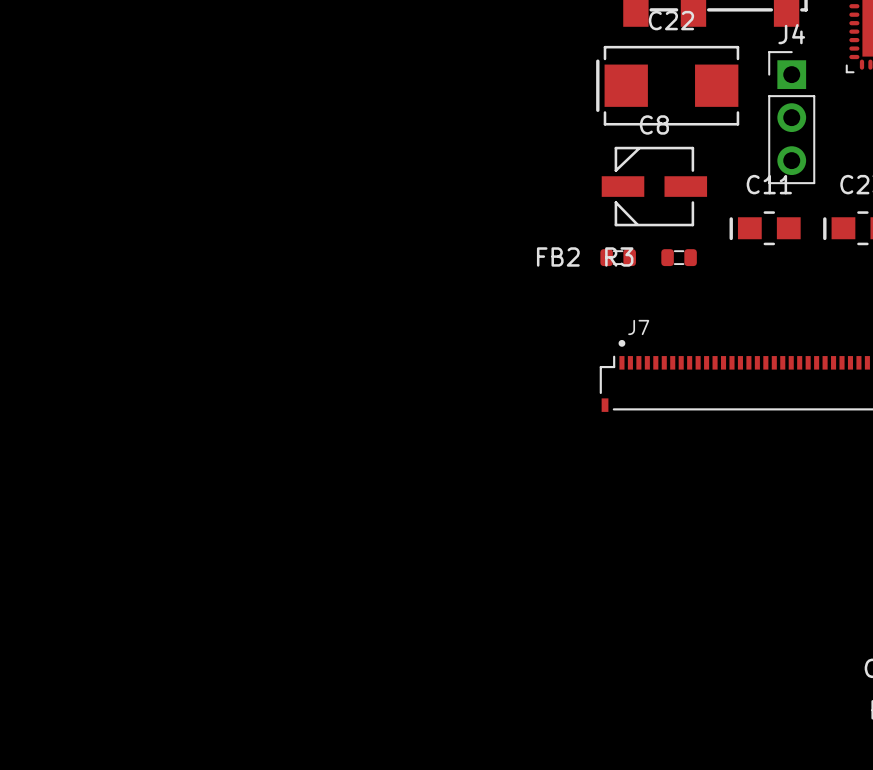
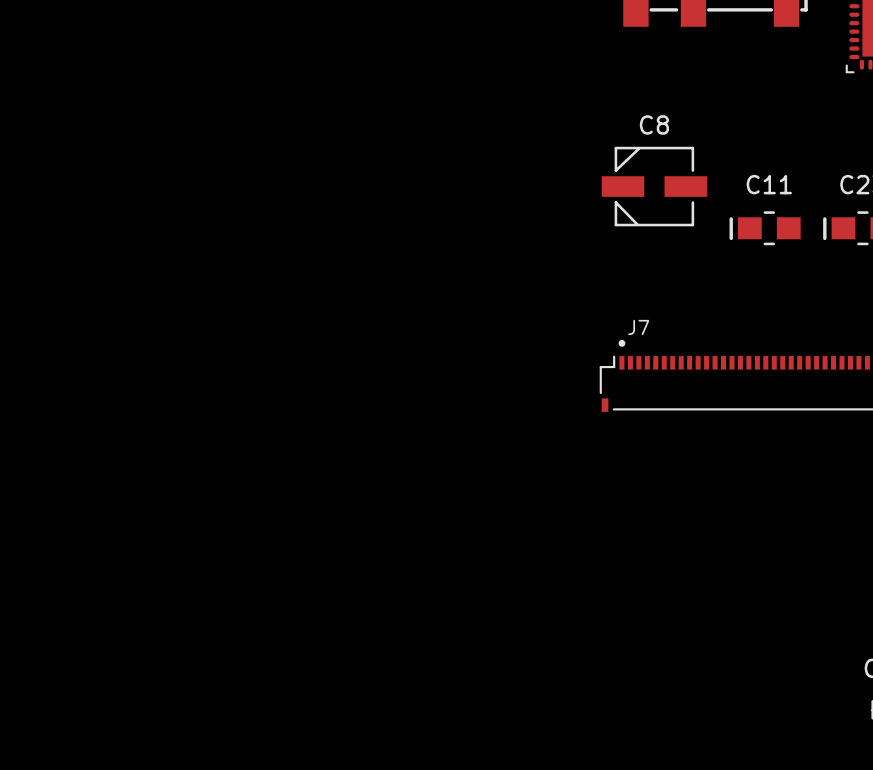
C22: (667, 85) -> none
J4: (791, 117) -> none
FB2: (618, 257) -> none
R3: (679, 257) -> none

